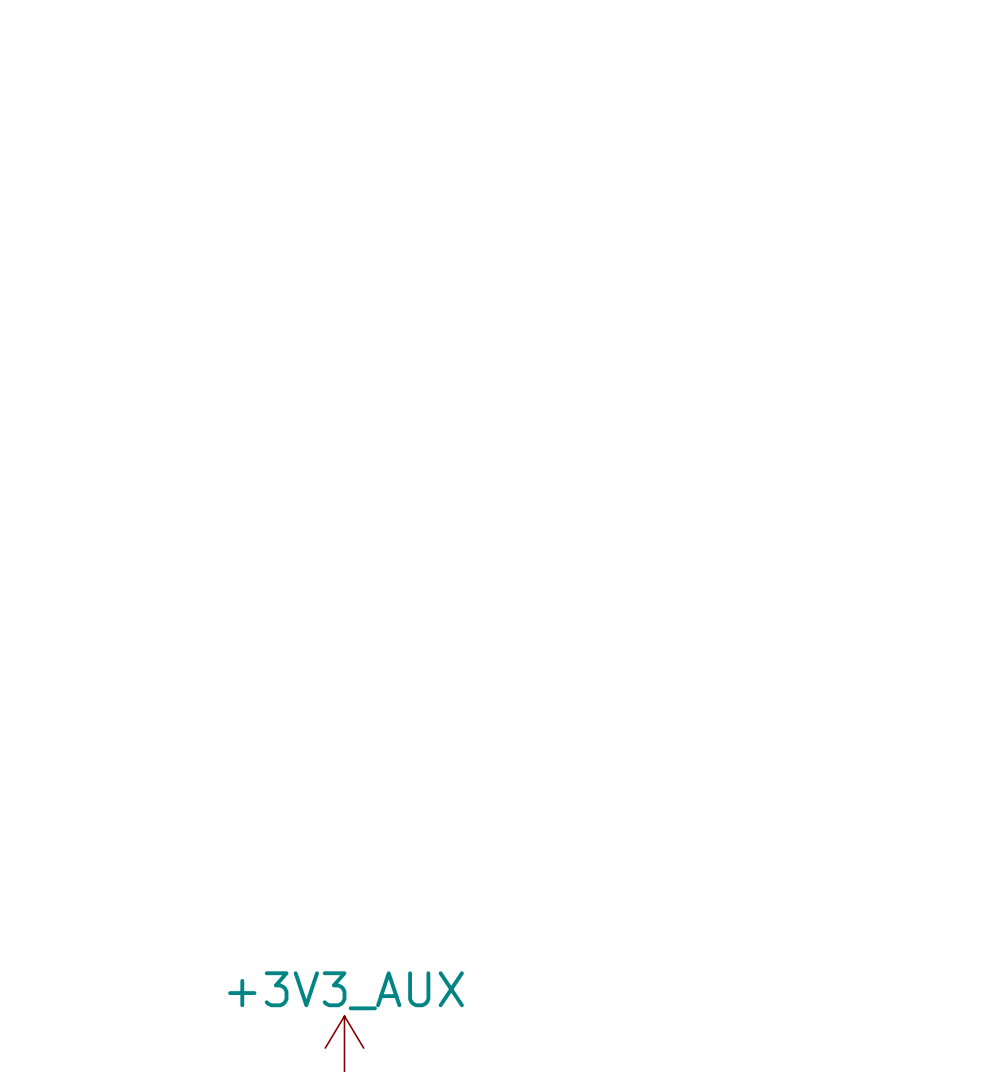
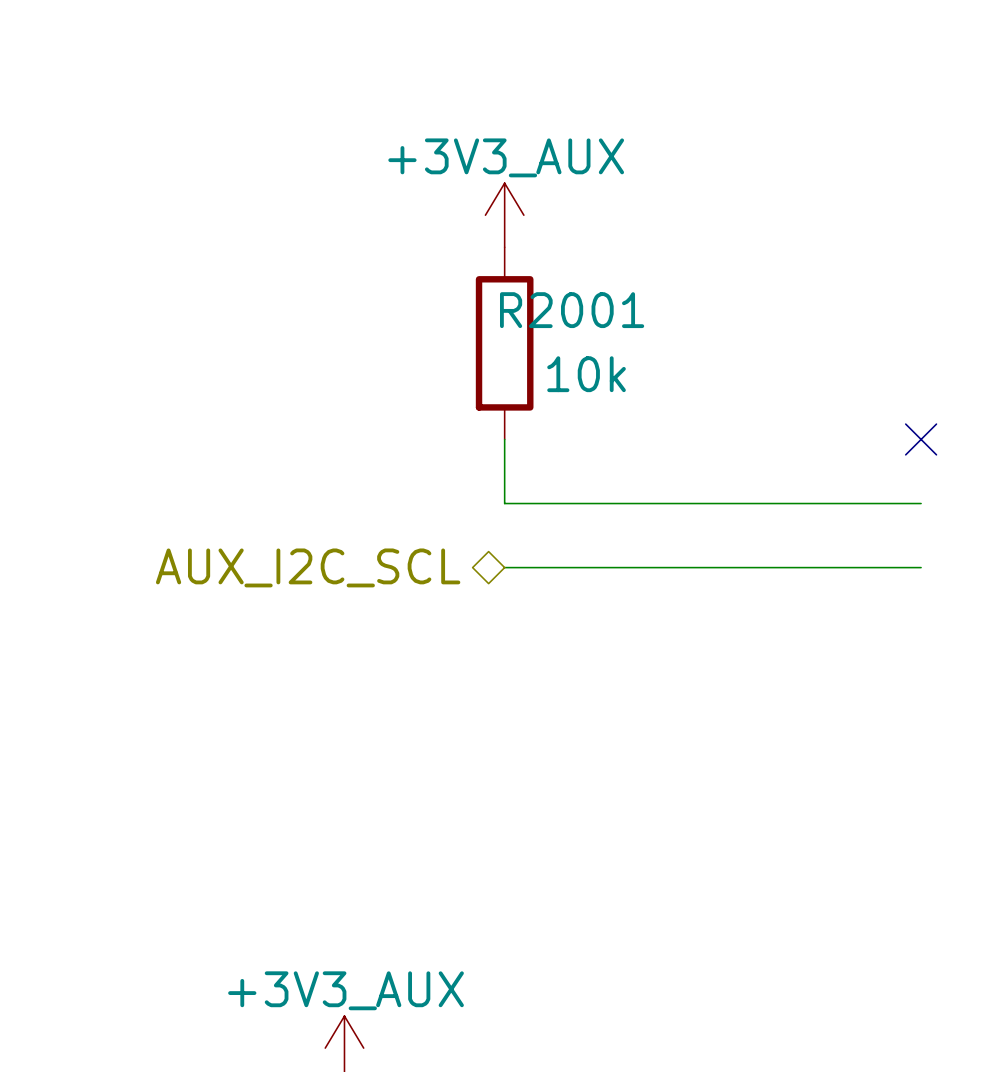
power symbol: none -> +3V3_AUX (504, 215)
R2001: none -> 10k (504, 343)
wire: none -> (504, 439) (504, 503) (921, 503)
no-connect mark: none -> (921, 439)
hierarchical label: none -> AUX_I2C_SCL (308, 567)
wire: none -> (504, 567) (921, 567)

